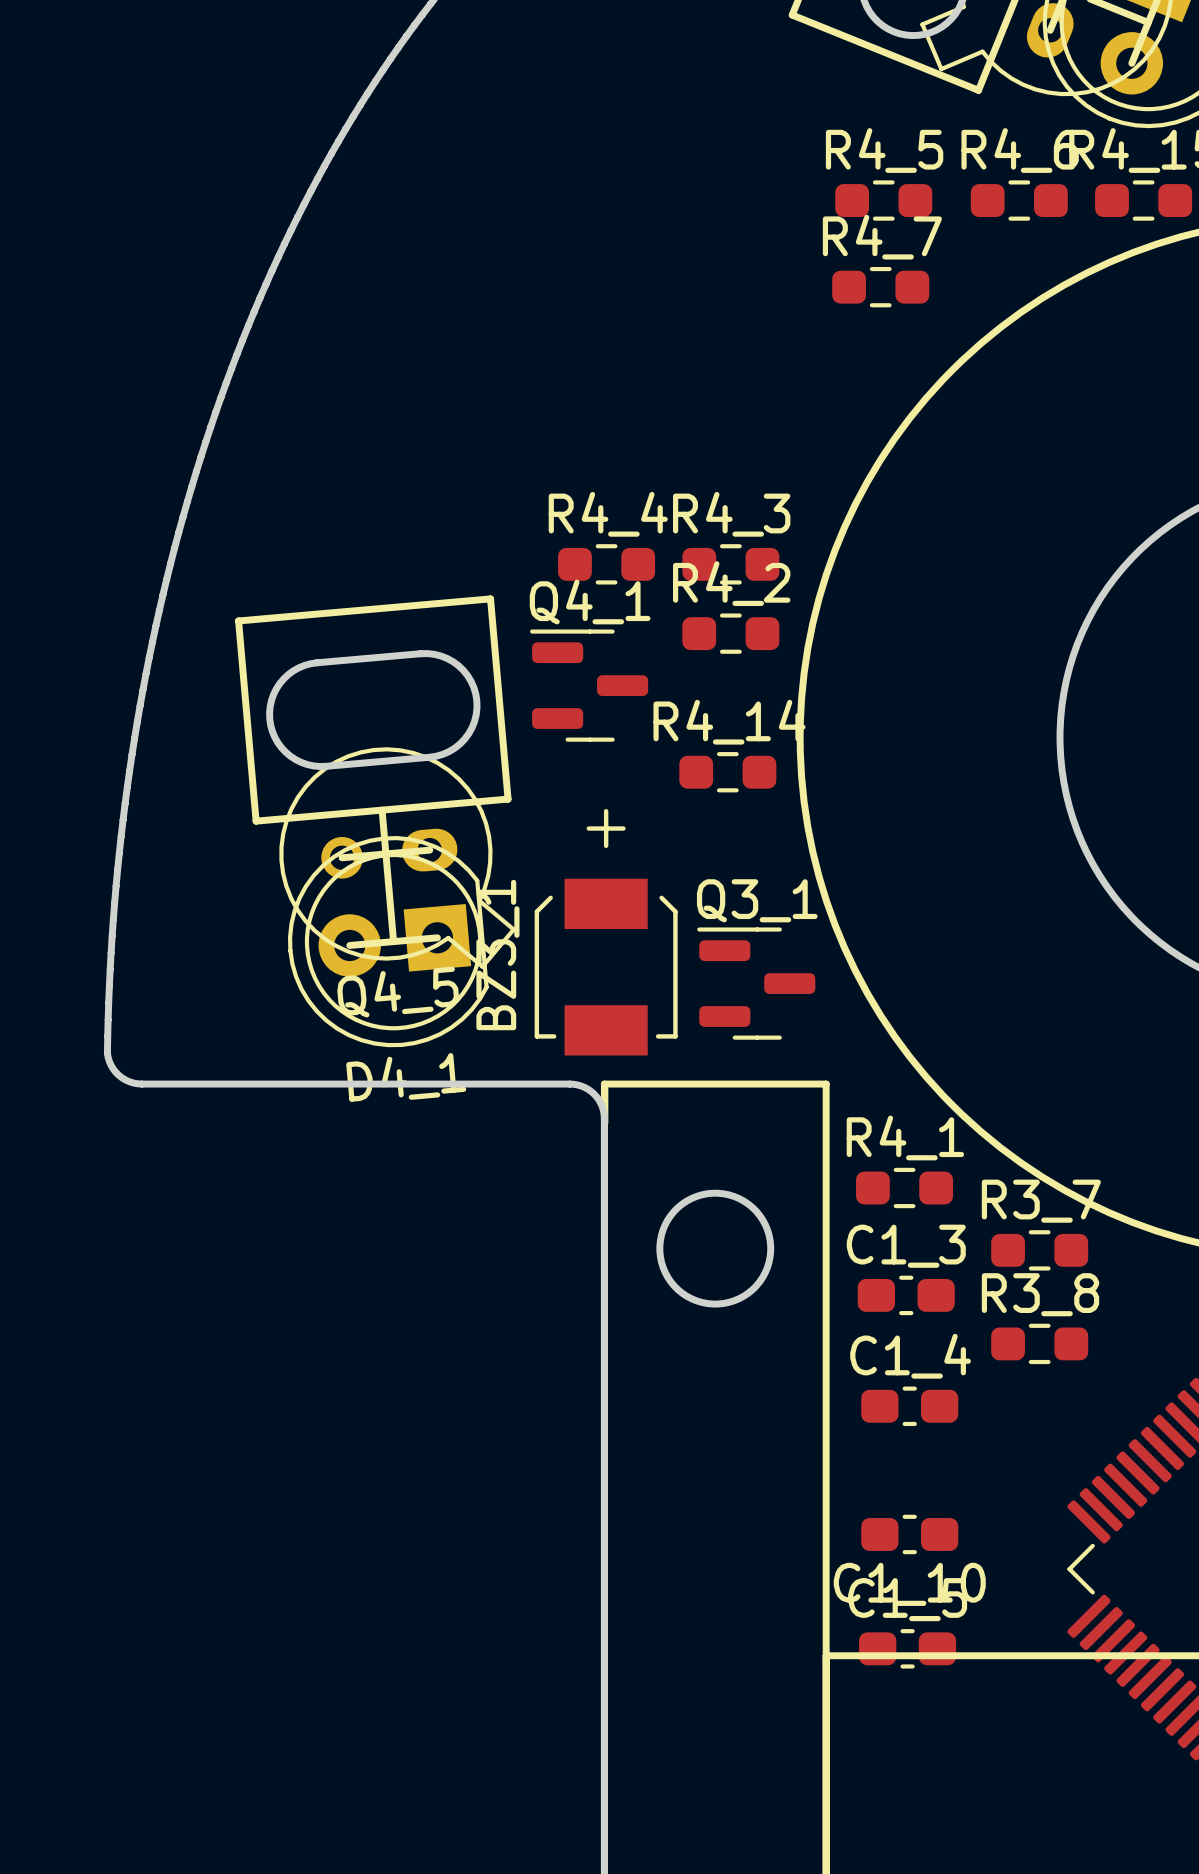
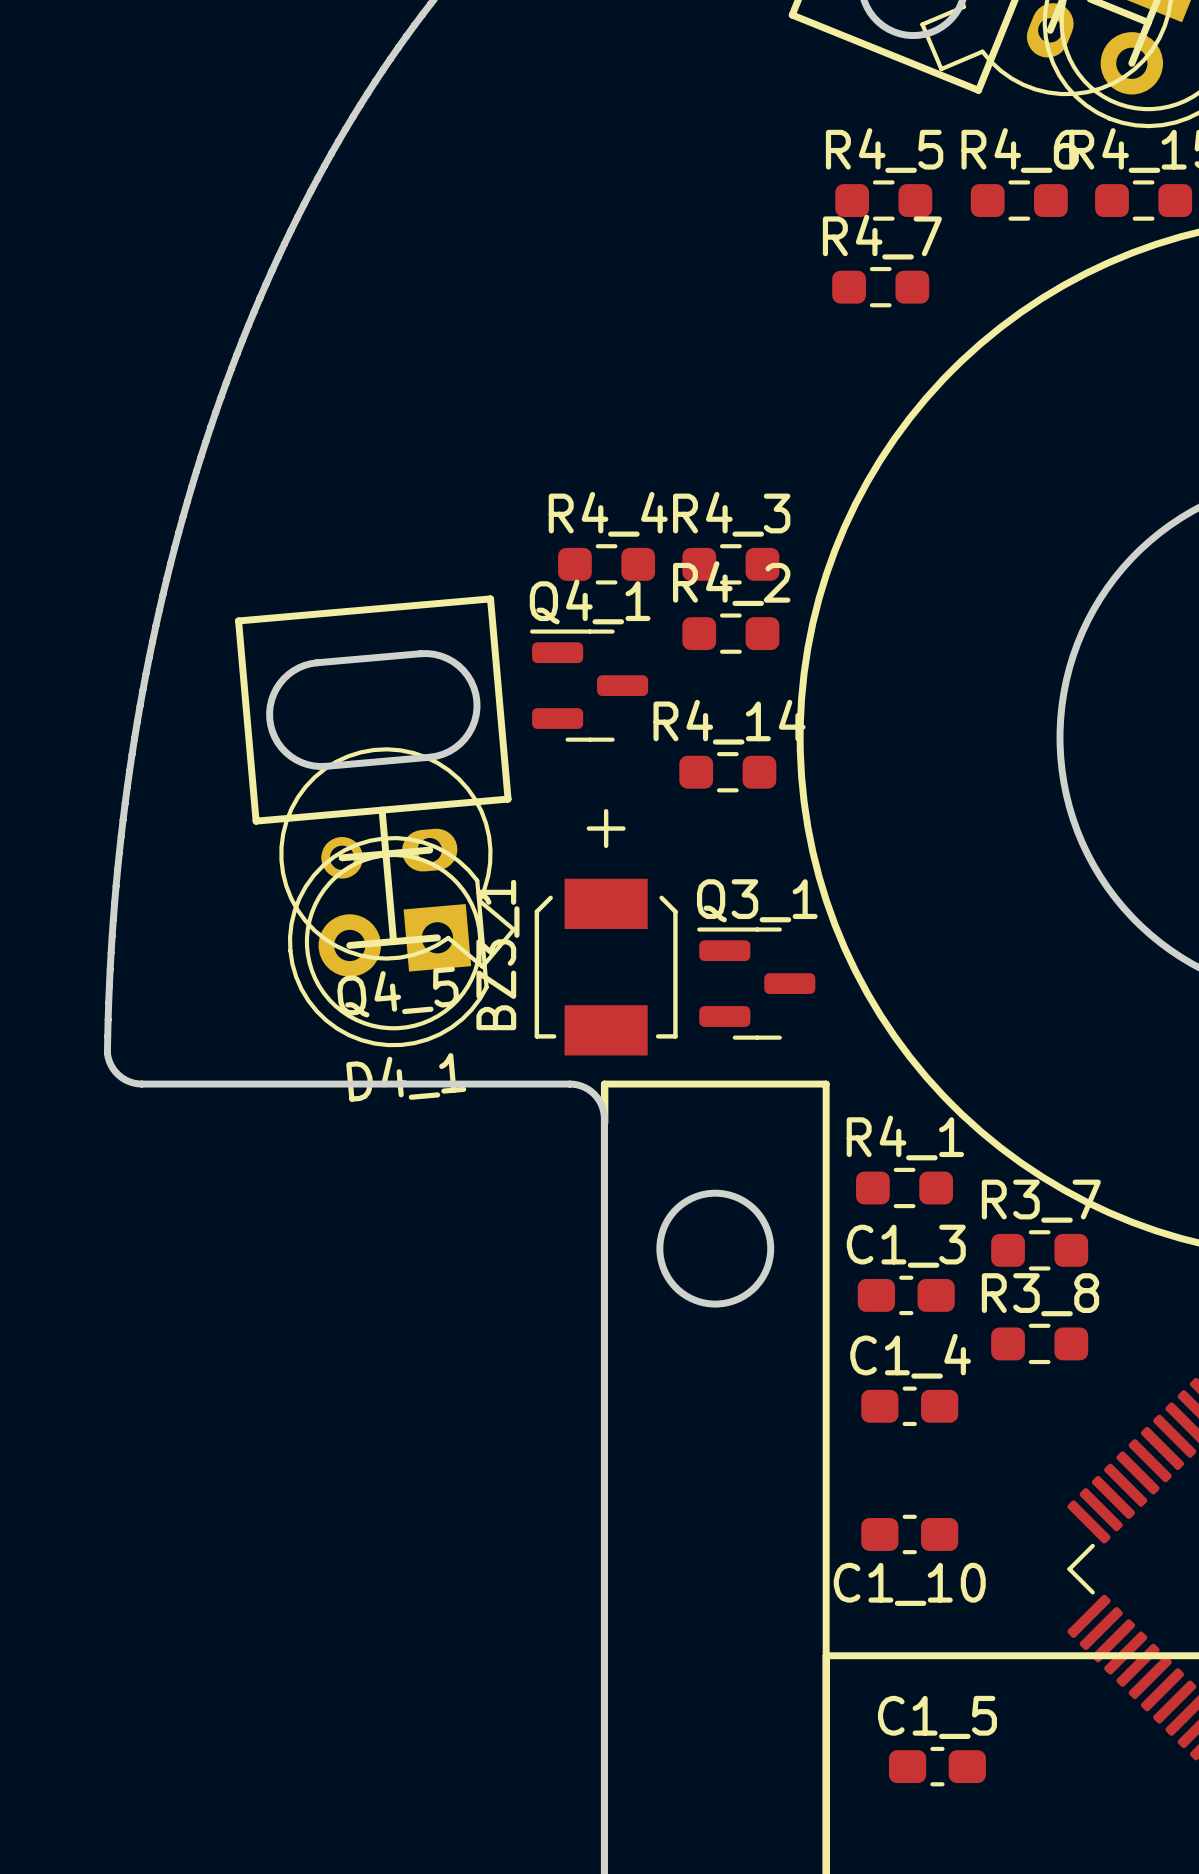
C1_5 position: (907, 1648) -> (937, 1766)

